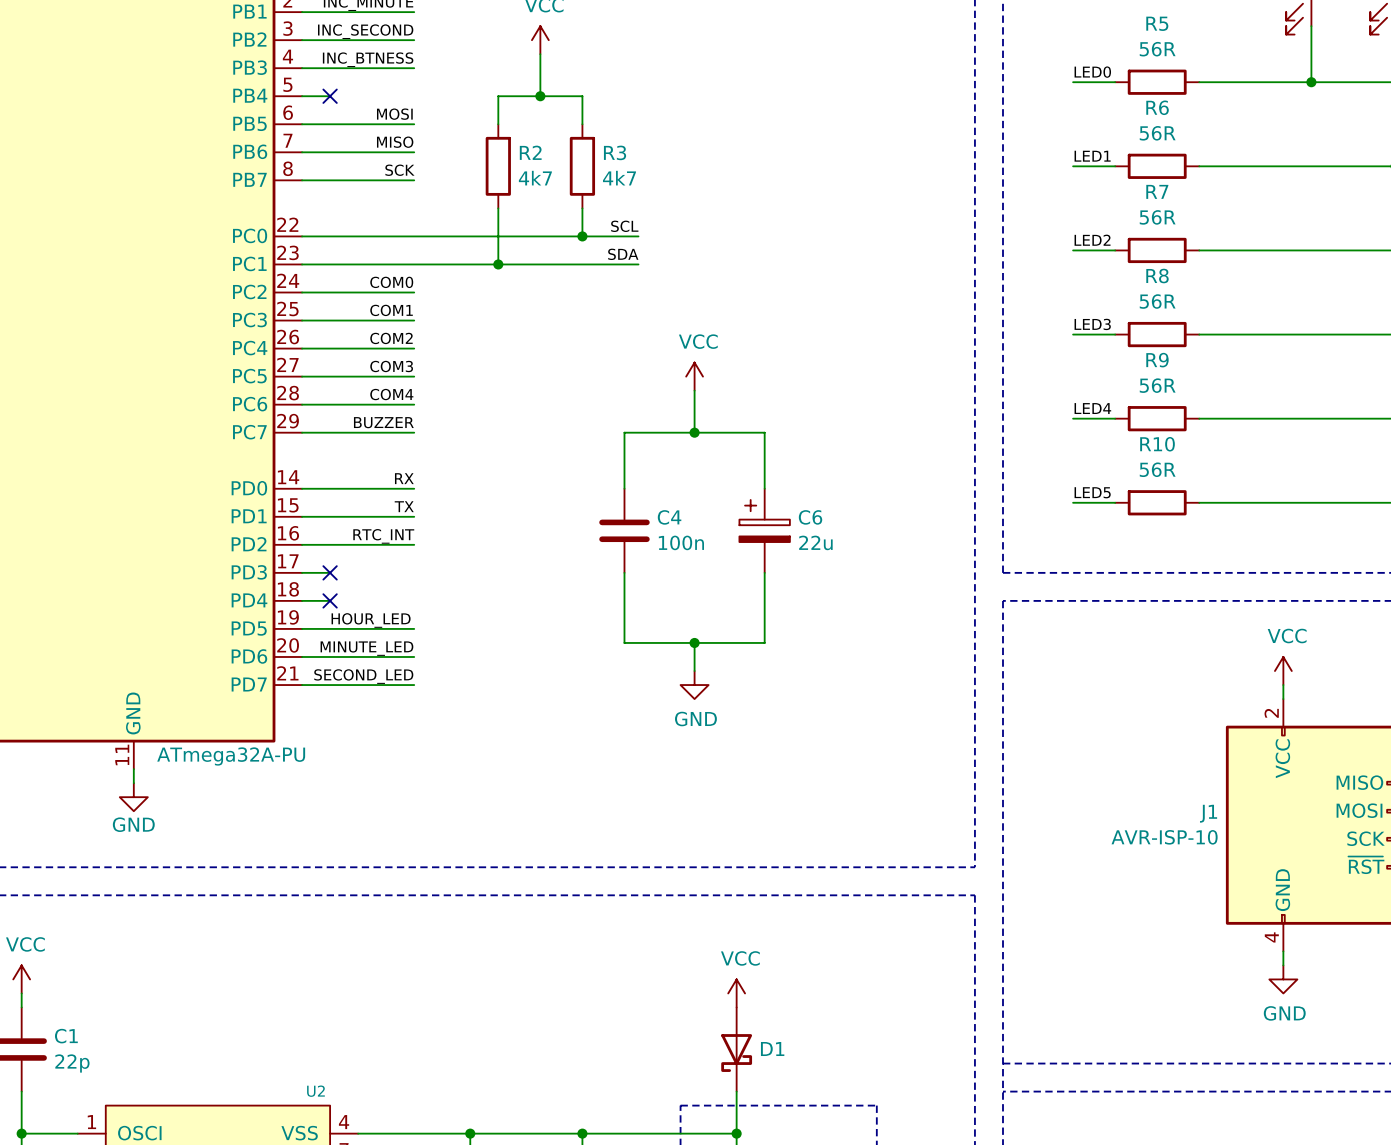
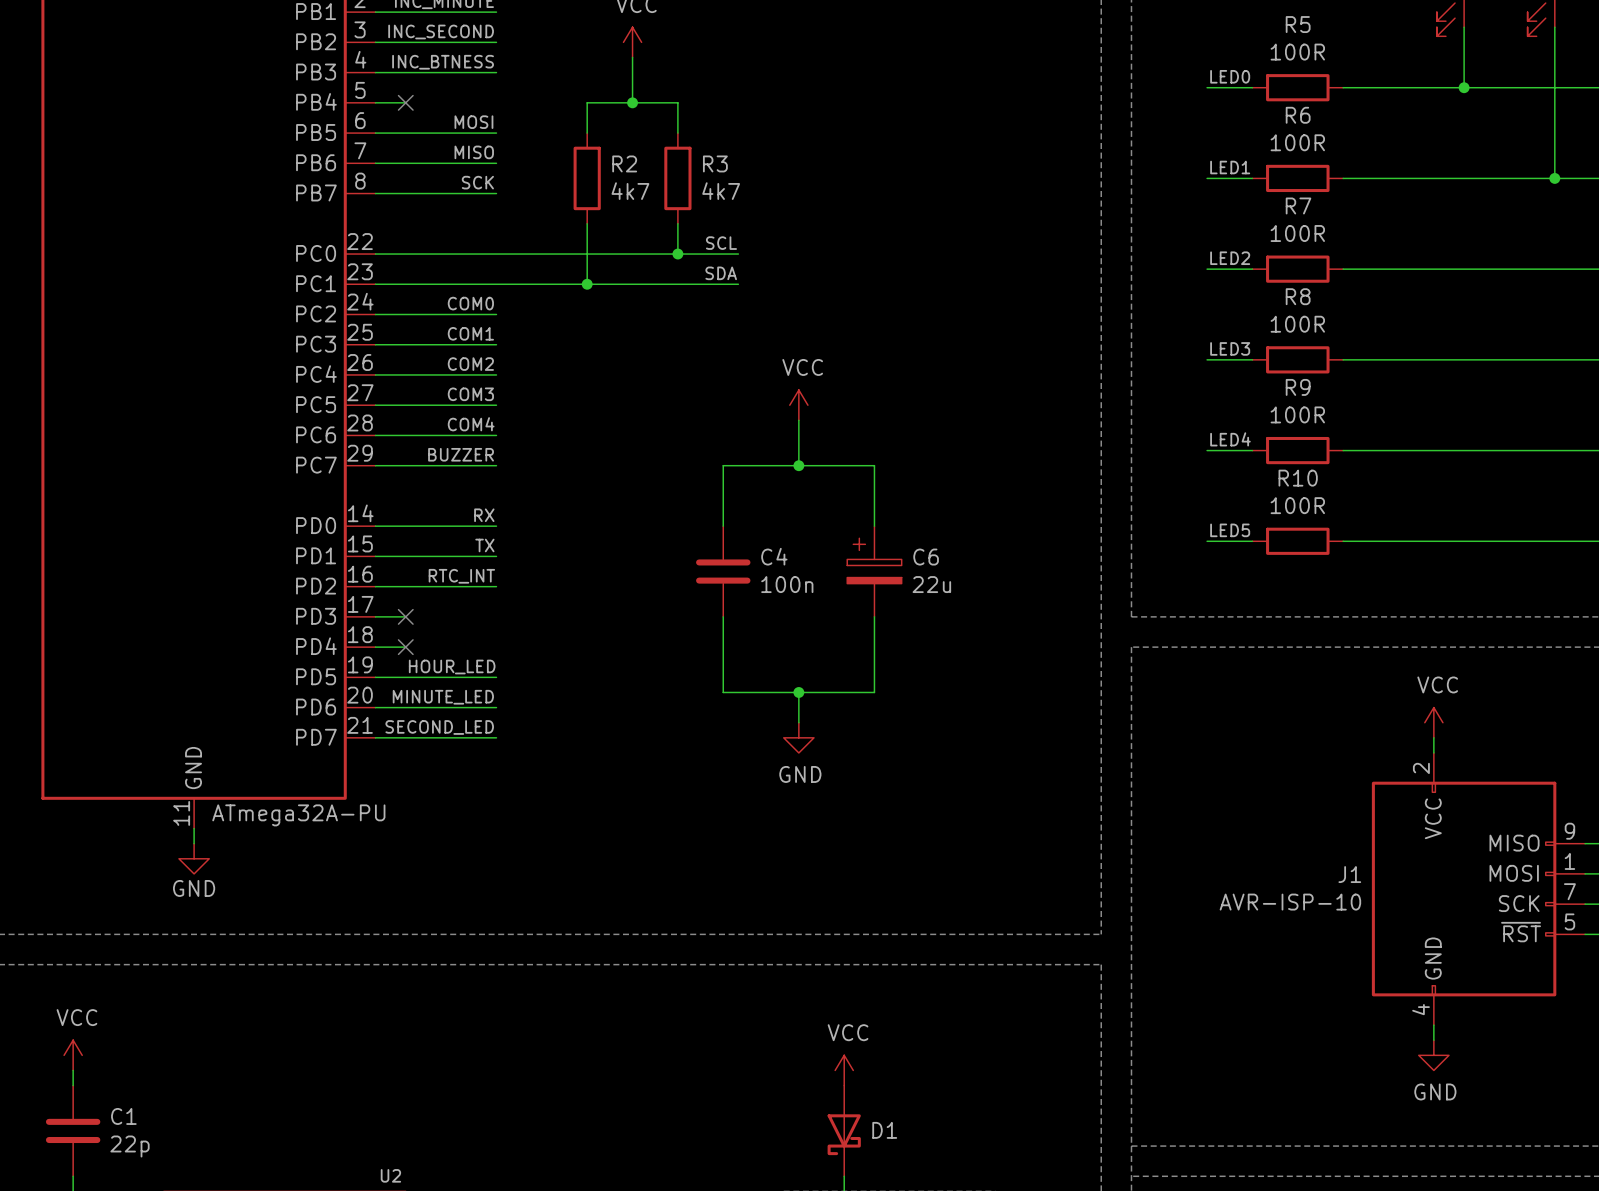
R5 value: 56R (1157, 49) -> 100R (1297, 52)
R6 value: 56R (1157, 133) -> 100R (1297, 142)
R7 value: 56R (1157, 217) -> 100R (1297, 233)
R8 value: 56R (1157, 301) -> 100R (1297, 324)
R9 value: 56R (1157, 385) -> 100R (1297, 414)
R10 value: 56R (1157, 469) -> 100R (1297, 505)

